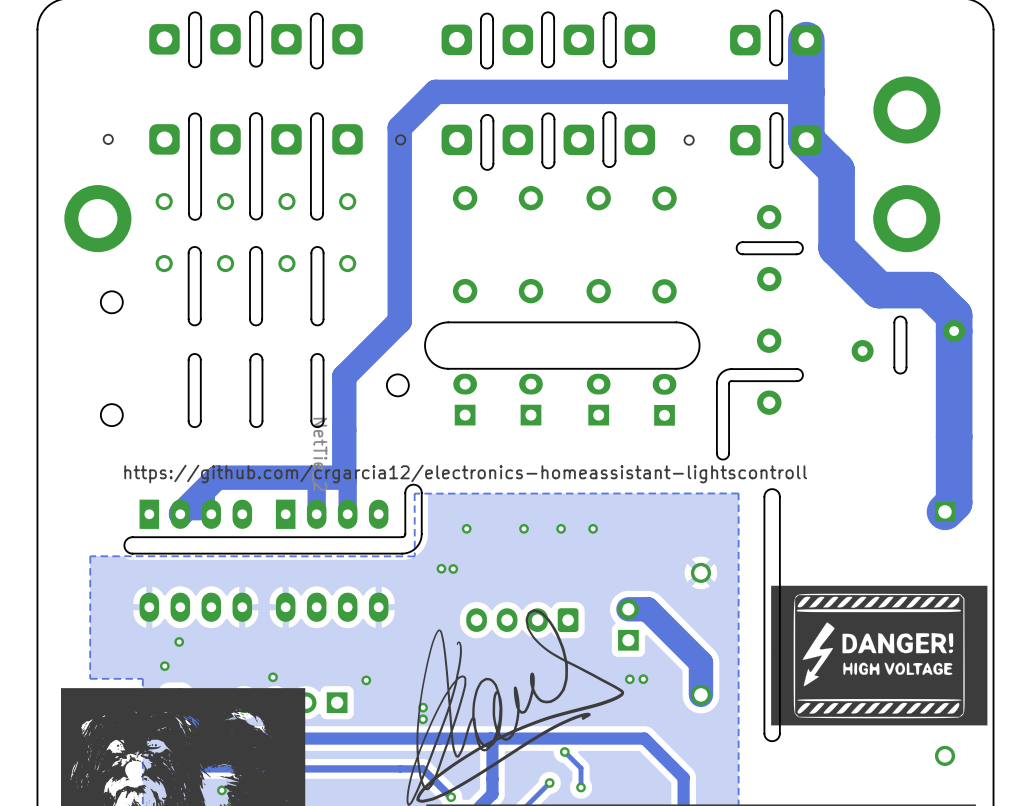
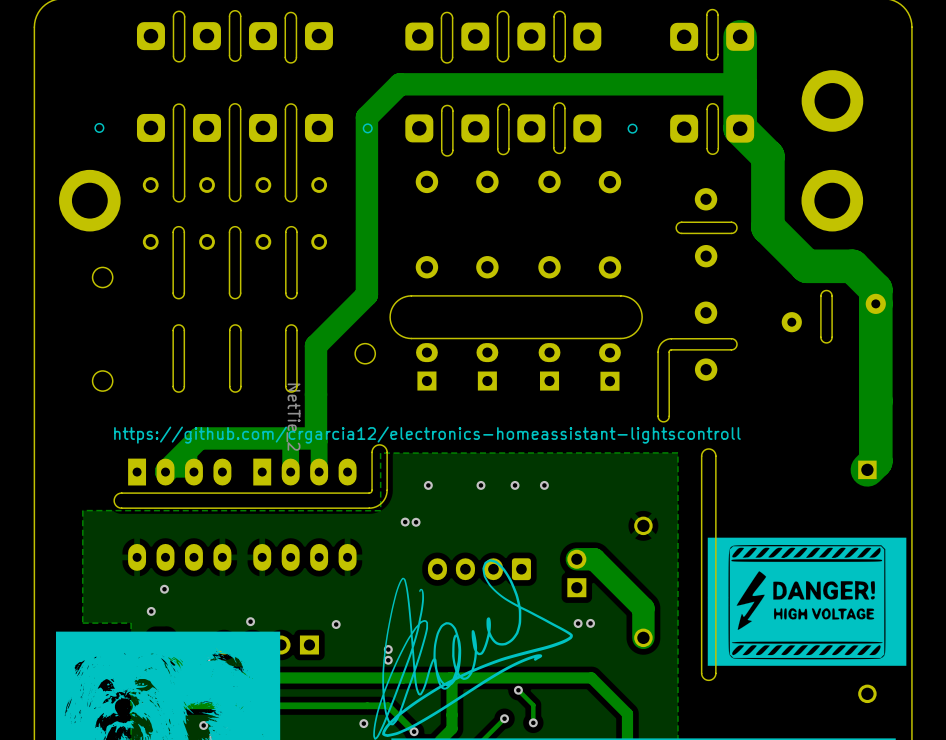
via: none -> (363, 723)

